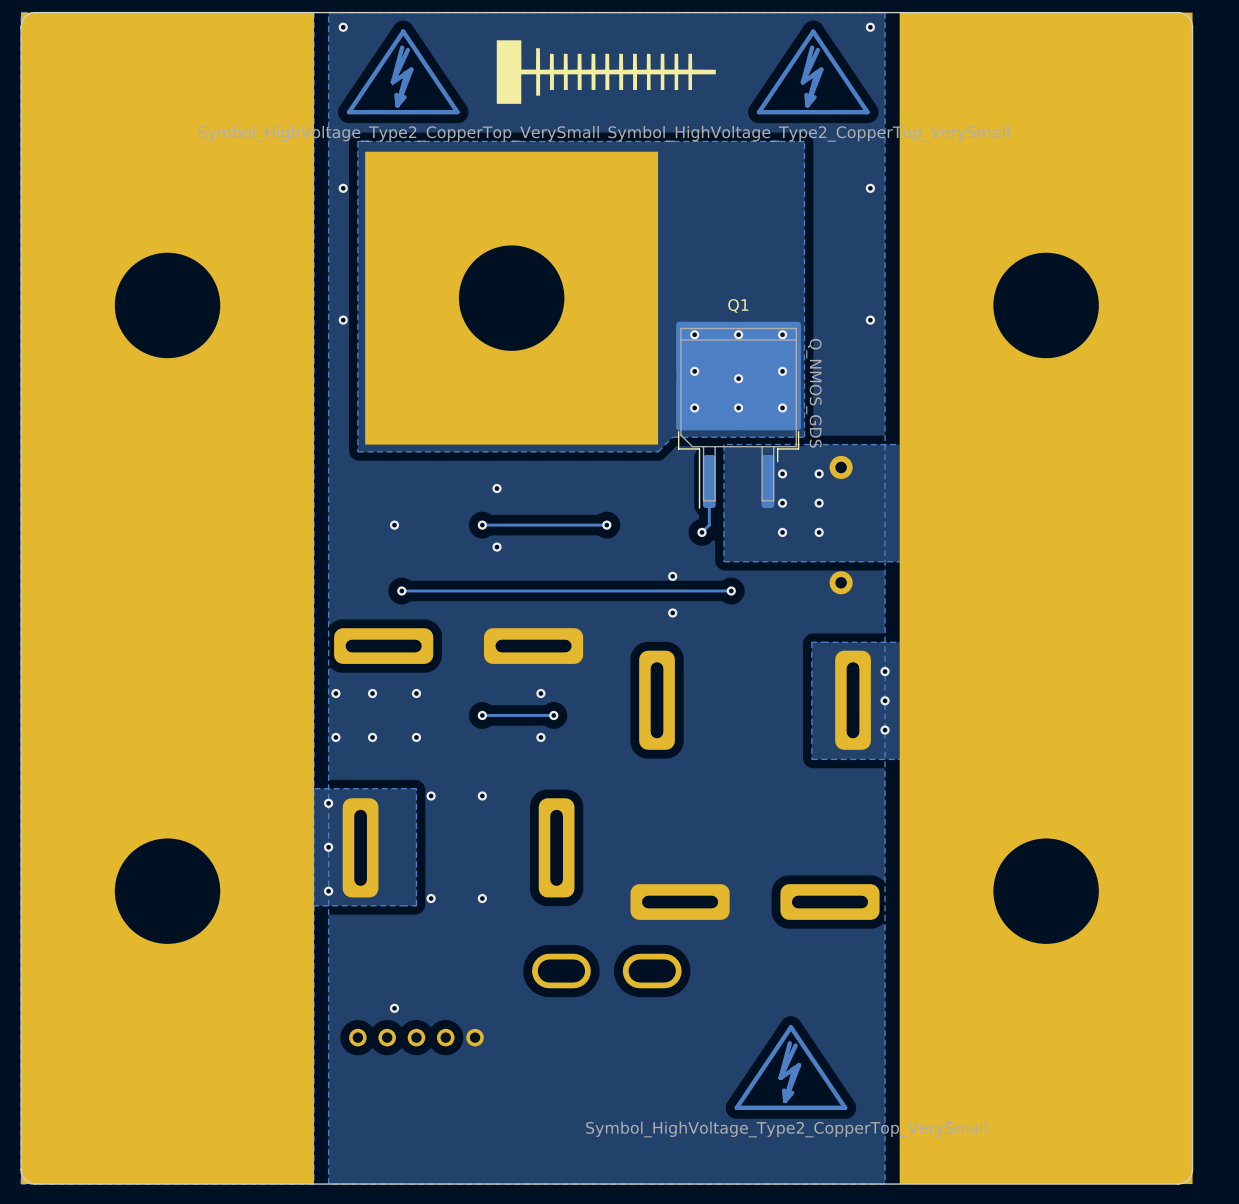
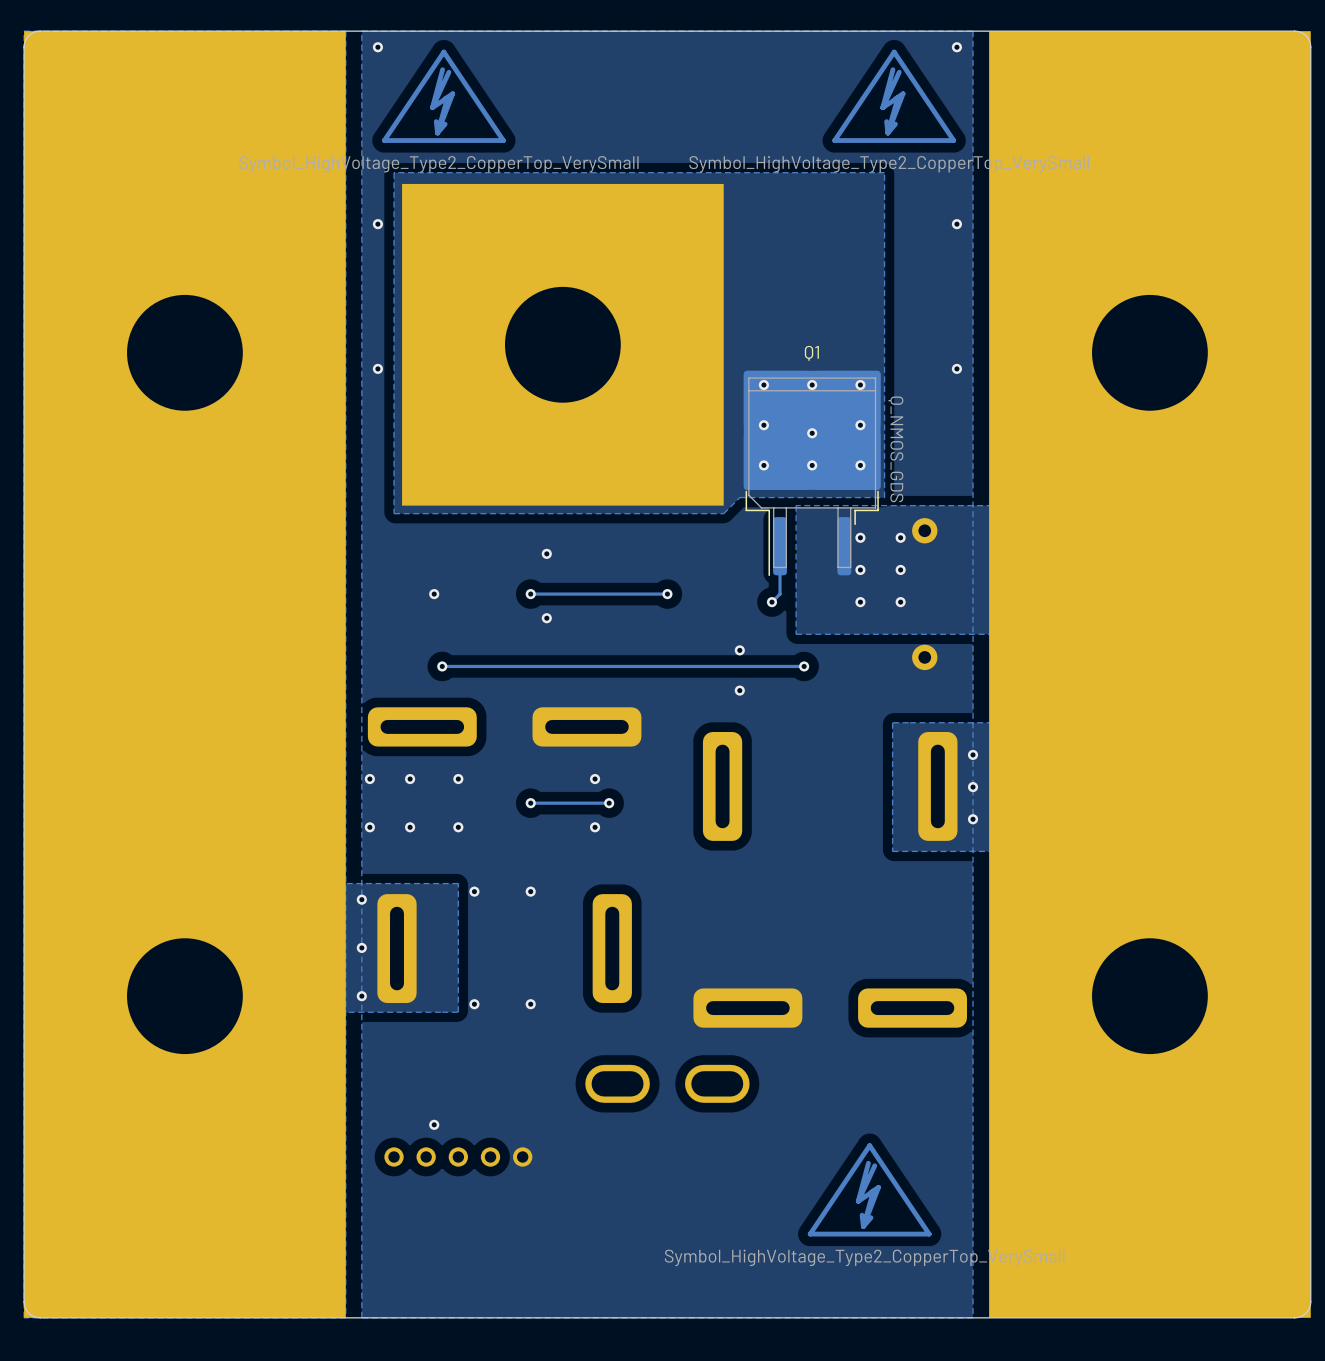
drawing: [496, 40, 716, 104] -> none

